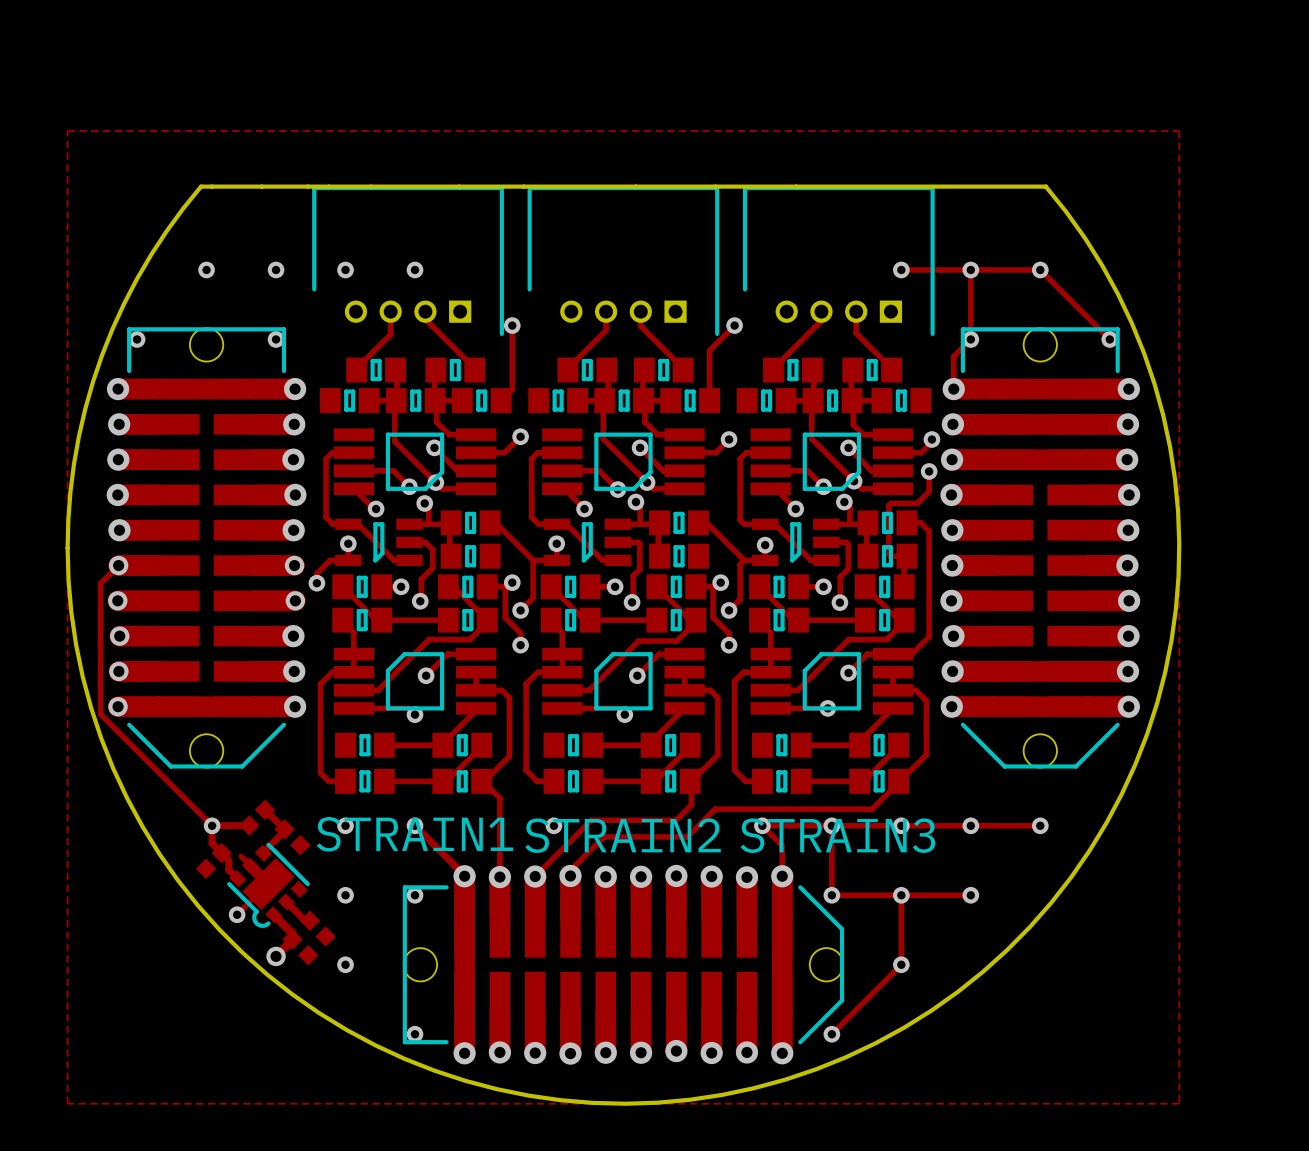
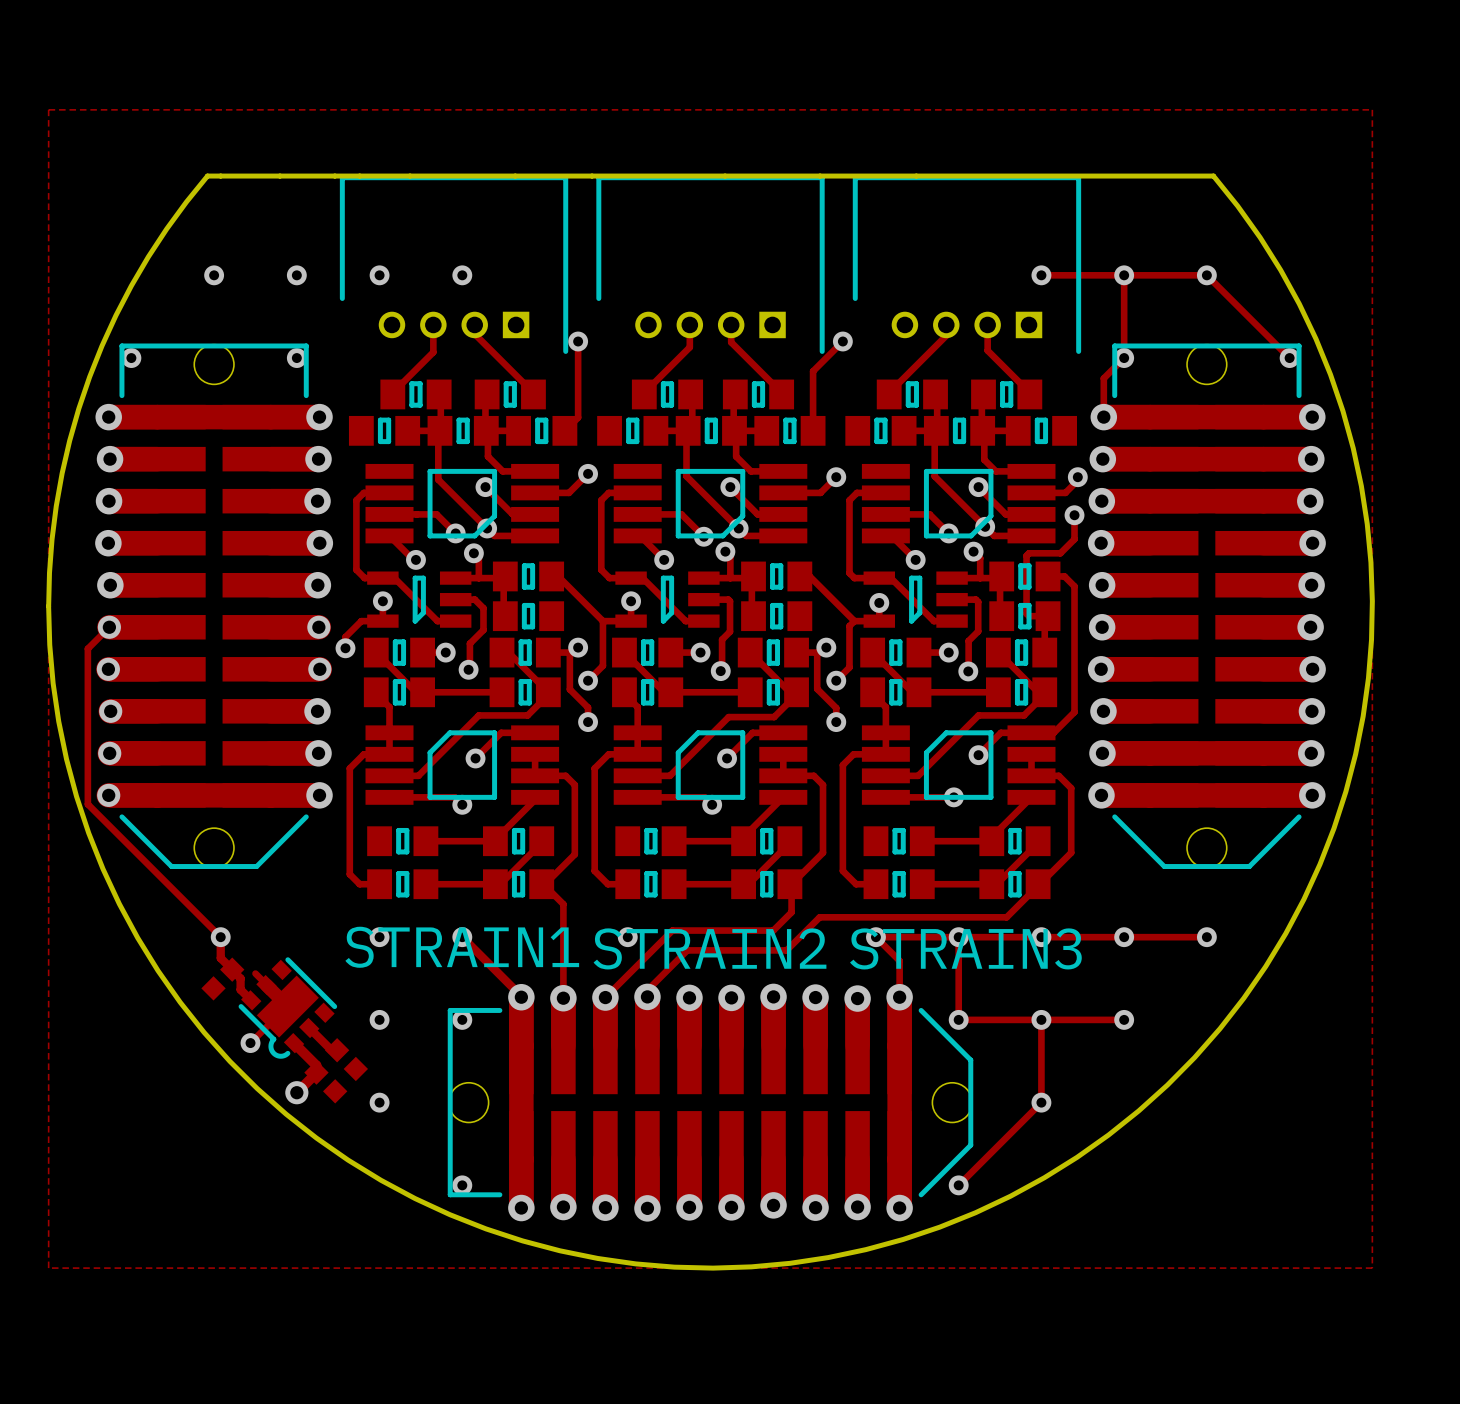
track: (265, 809) (284, 831) (263, 852) -> none
part: (257, 817) -> none
track: (212, 825) (249, 825) -> none
part: (292, 837) -> none

